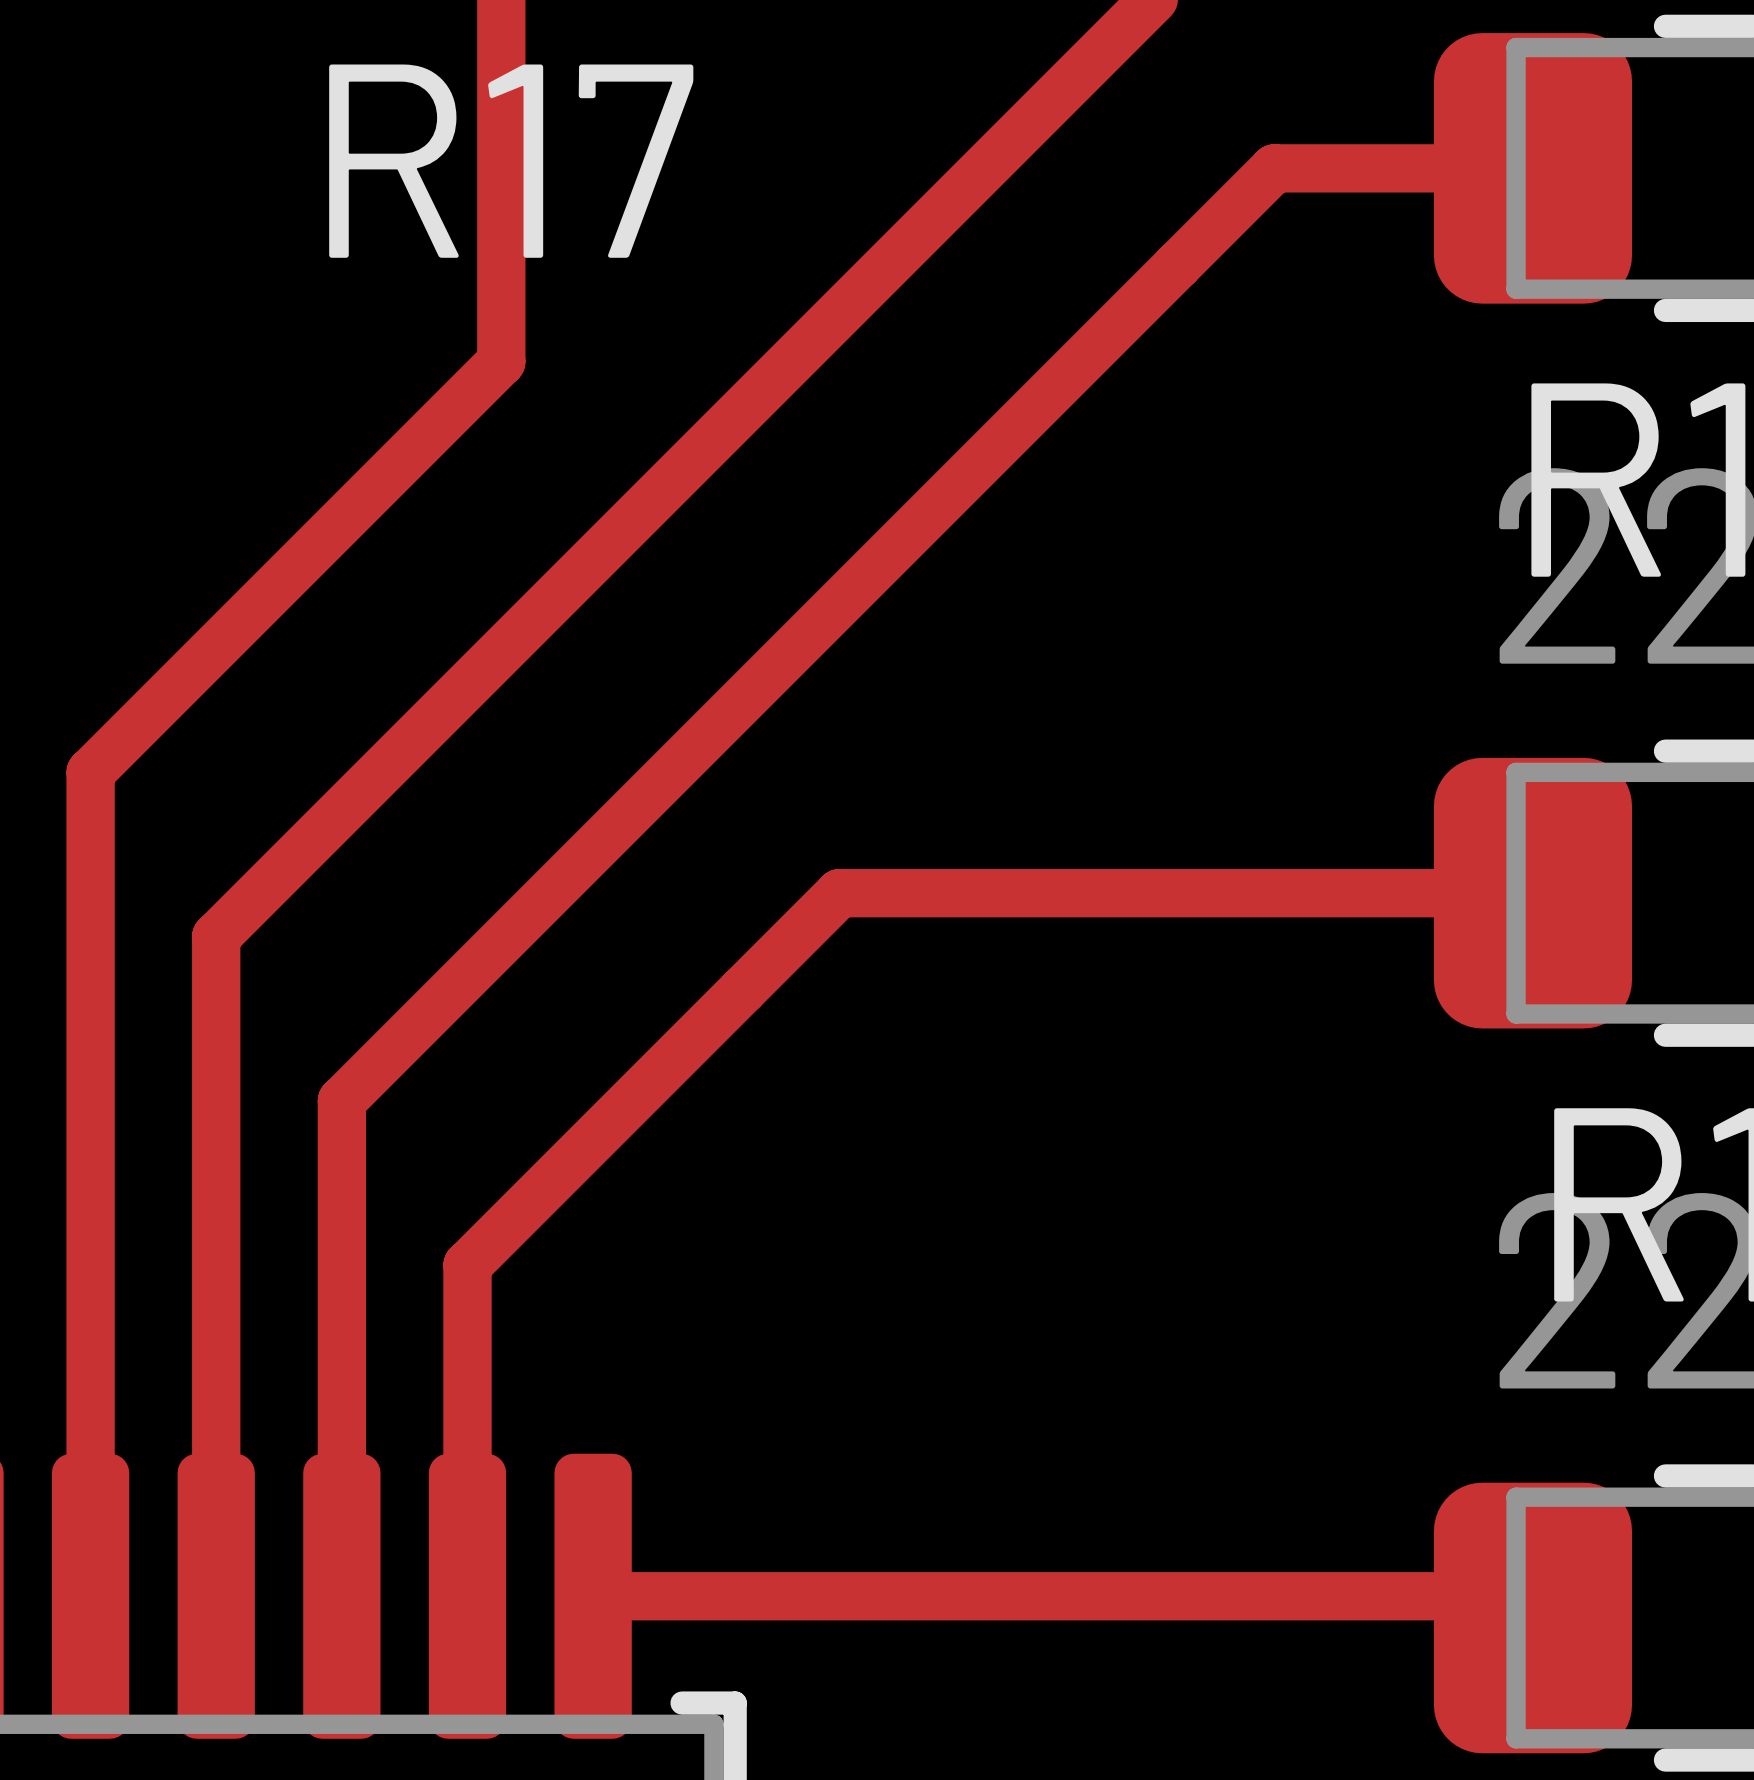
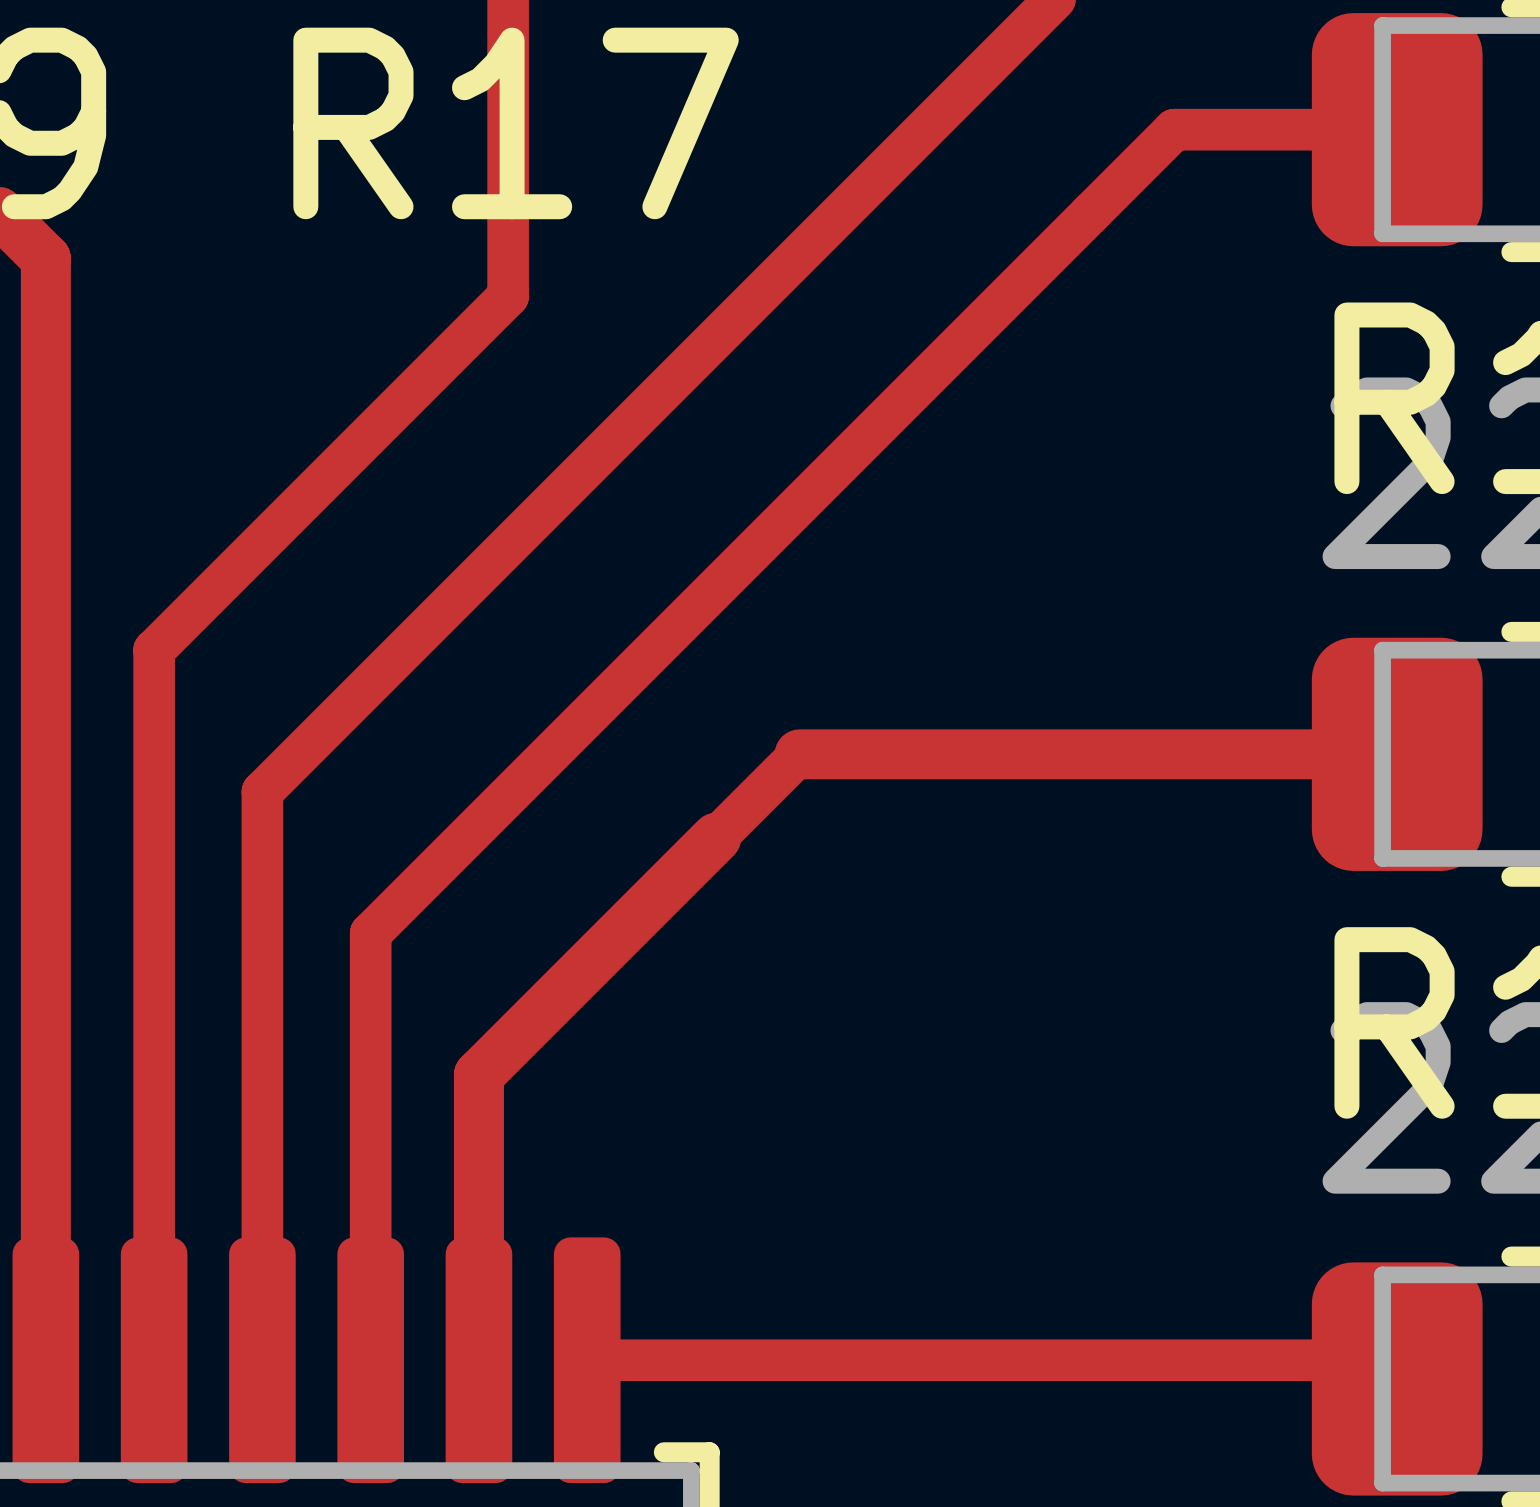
top track width: thin (839, 893) (1532, 893) -> thick (799, 754) (1397, 754)
top track width: thin (742, 989) (467, 1265) (467, 1596) -> thick (716, 837) (478, 1074) (478, 1360)

